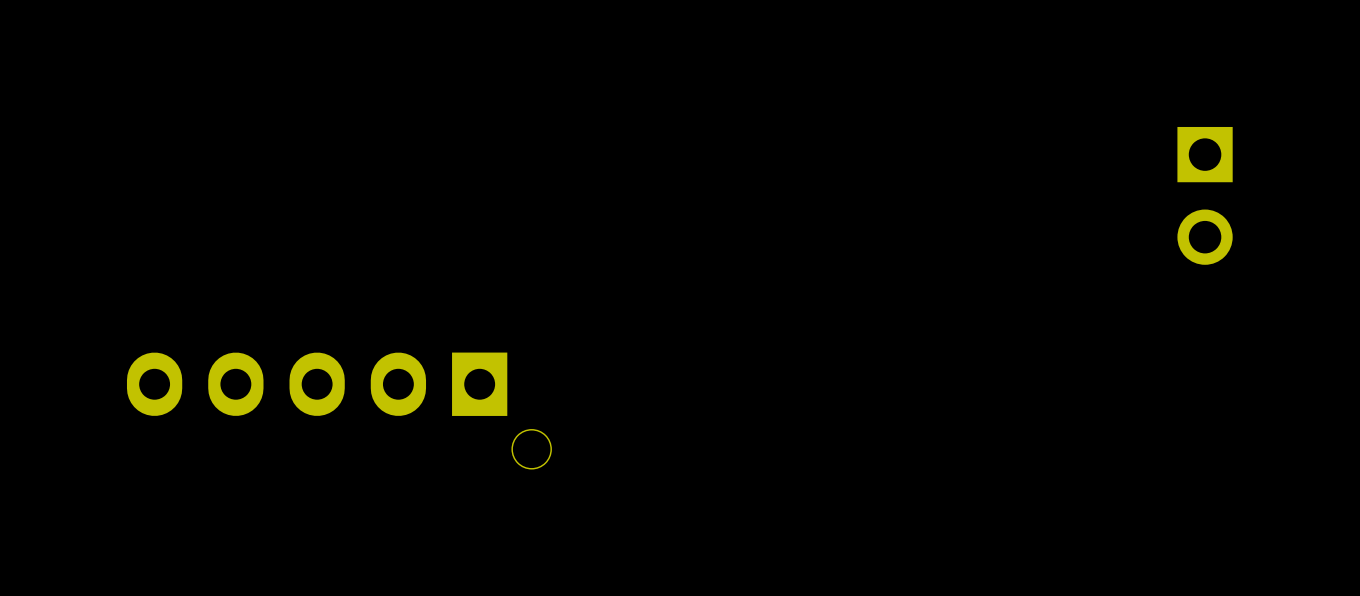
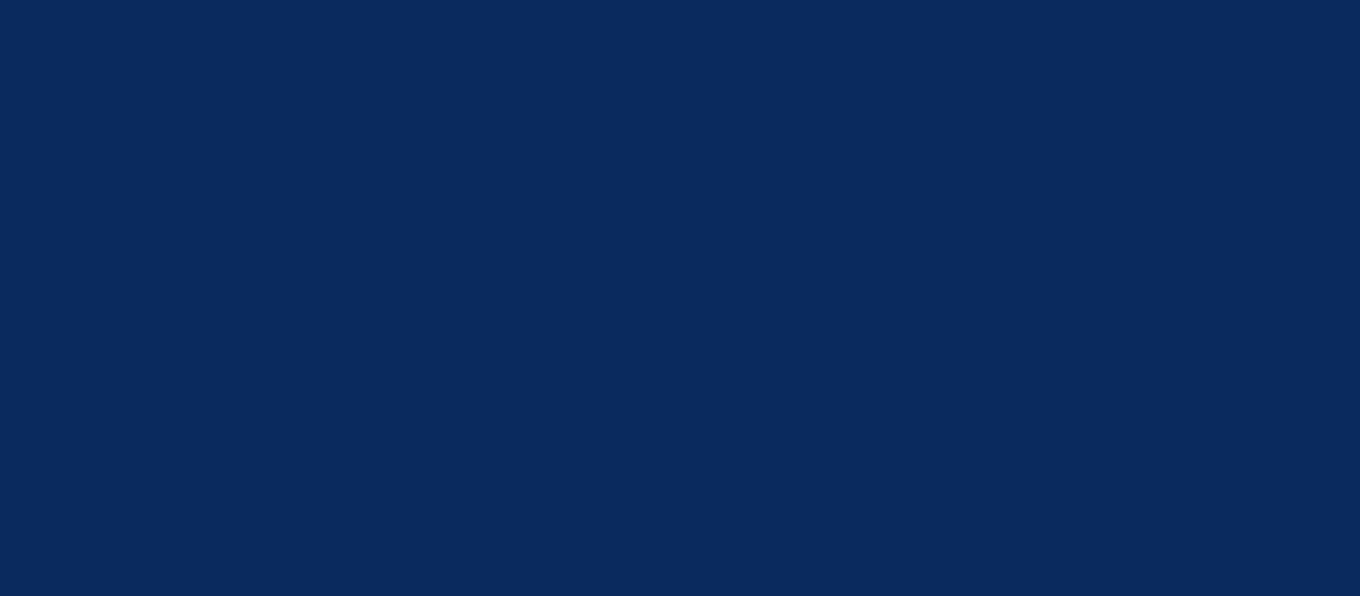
part: (1205, 195) -> none
part: (339, 410) -> none

